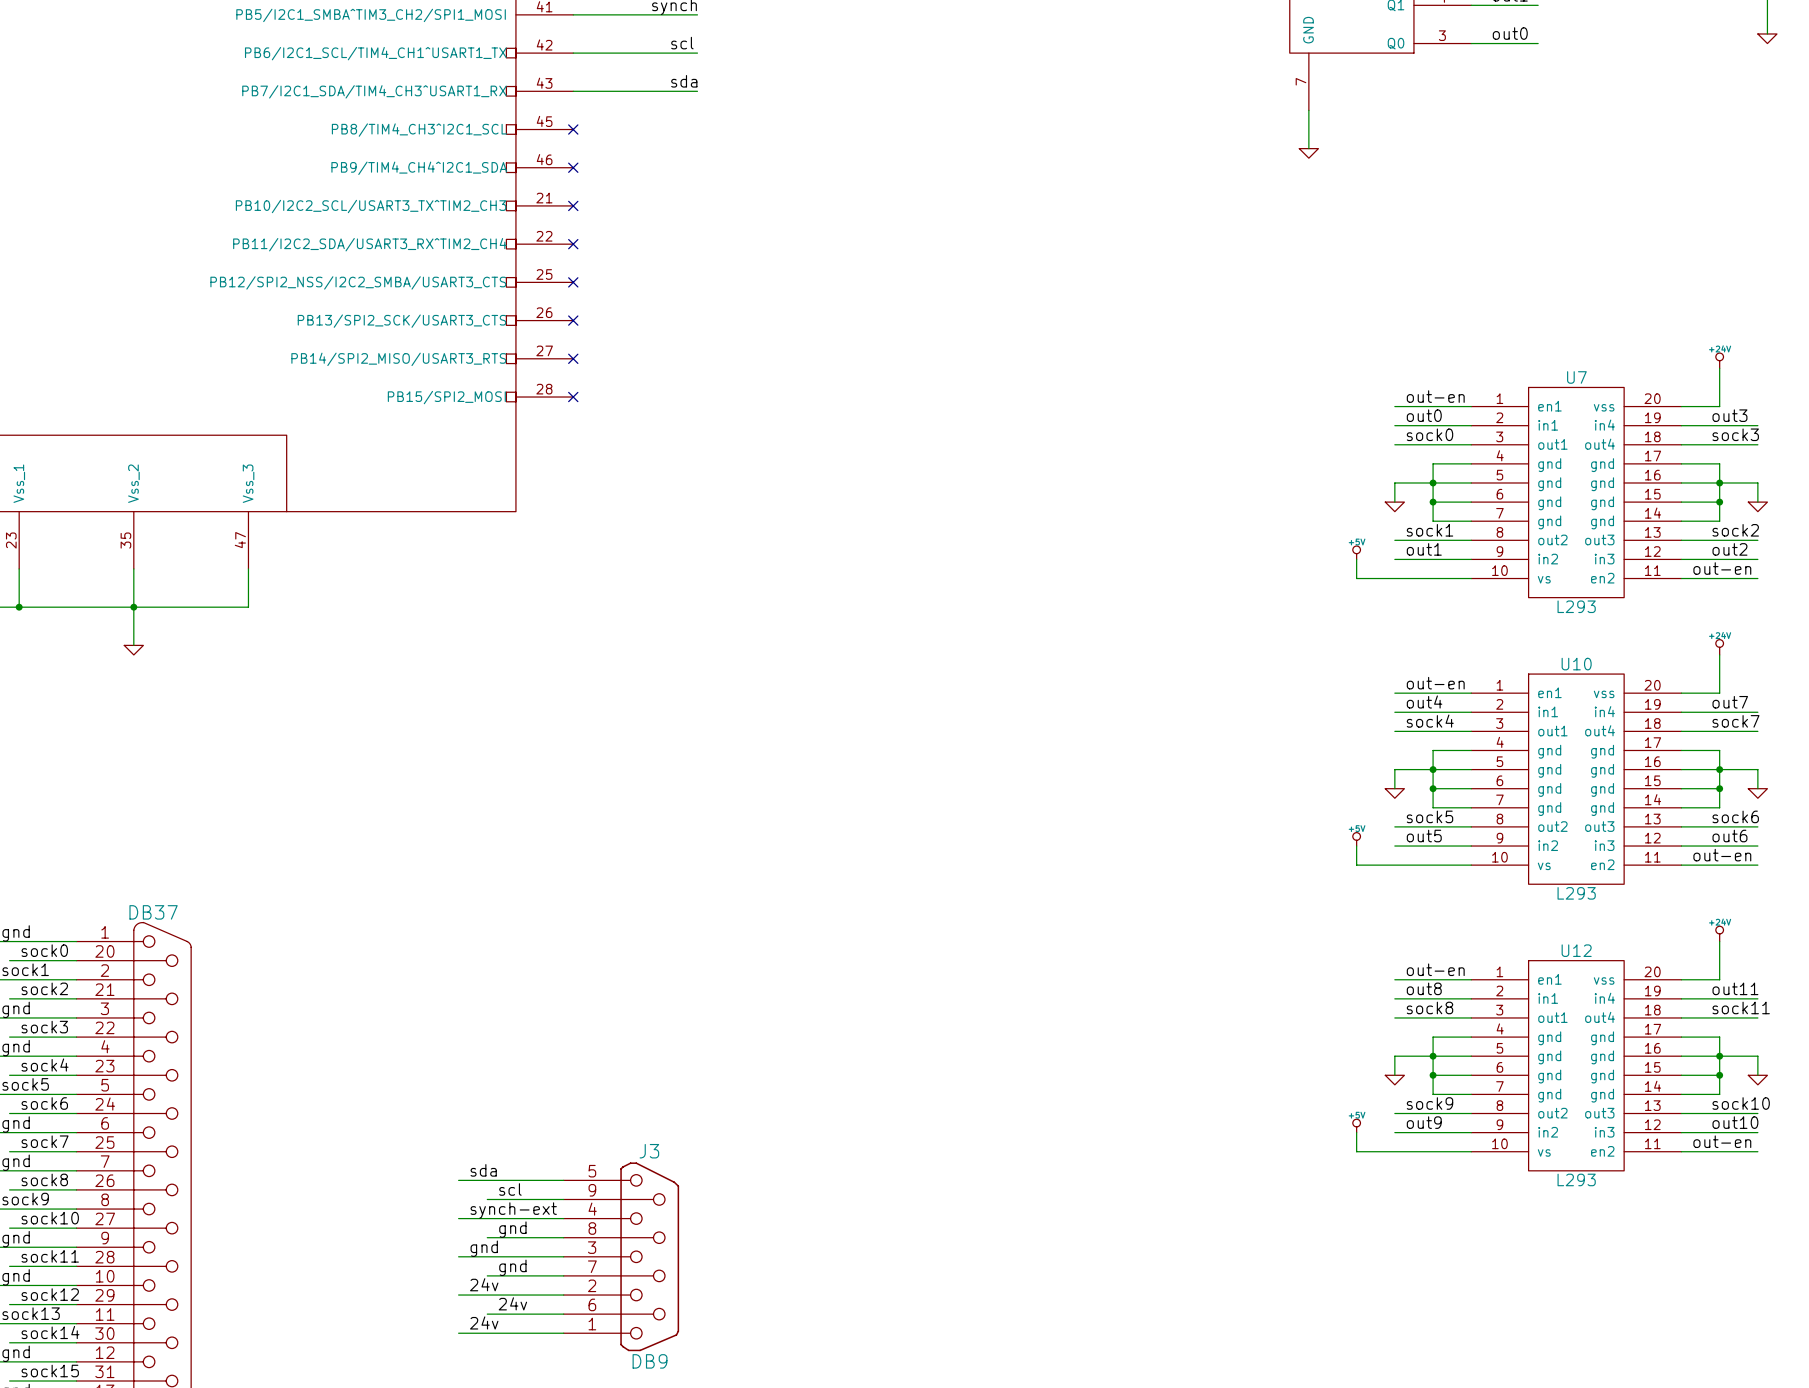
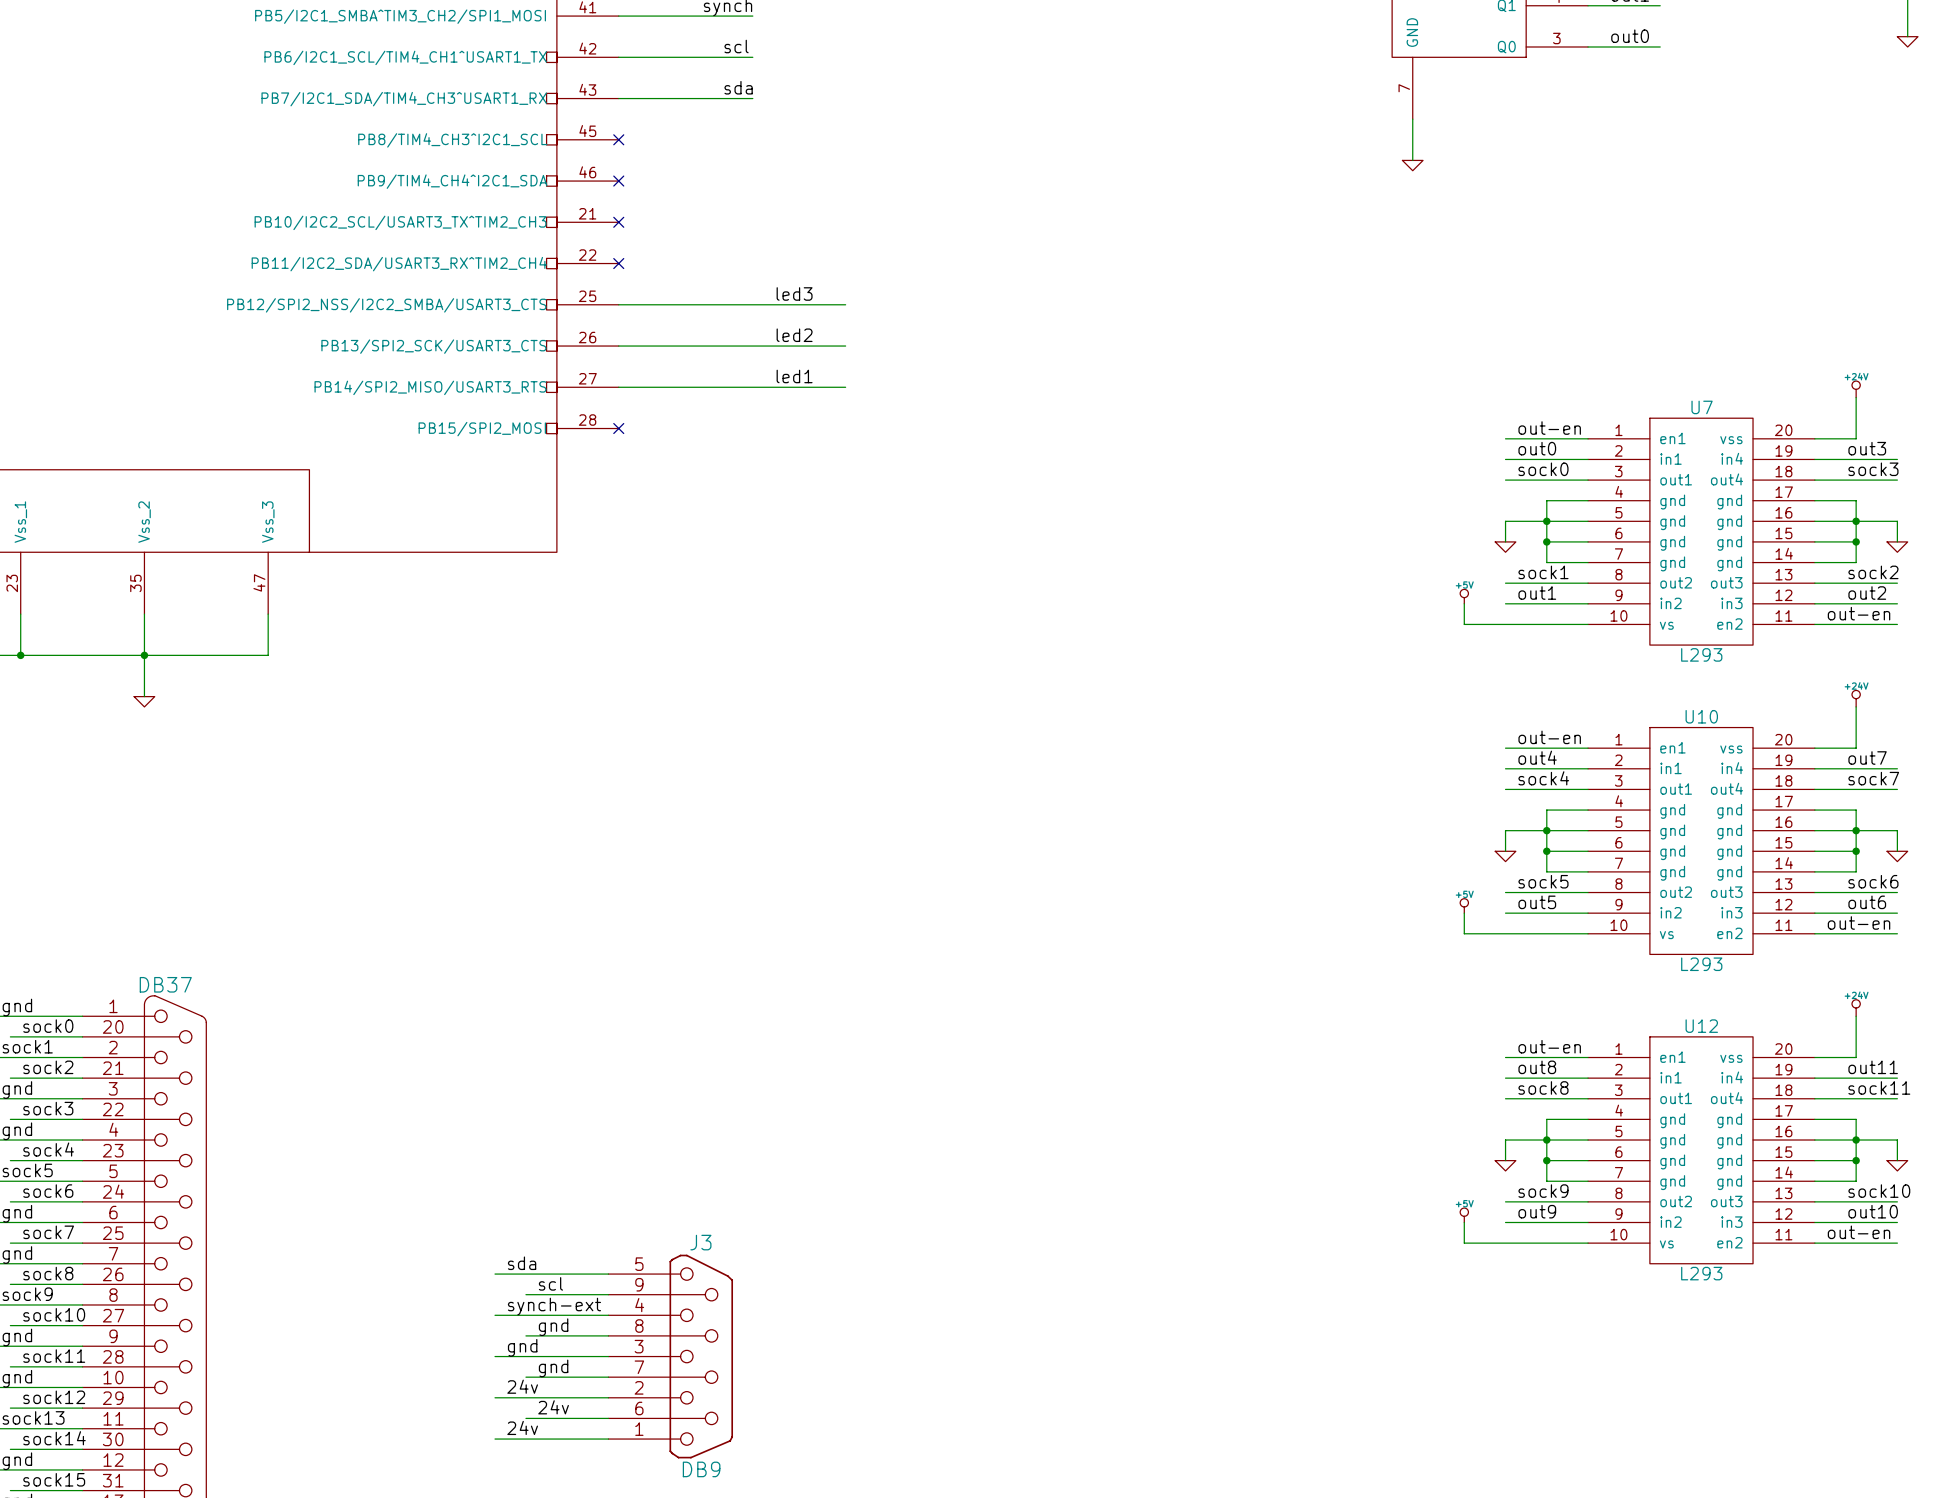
label: none -> led3 (794, 293)
wire: none -> (618, 304) (845, 304)
no-connect mark: (573, 282) -> none
label: none -> led2 (794, 335)
wire: none -> (618, 346) (845, 346)
no-connect mark: (573, 320) -> none
label: none -> led1 (794, 376)
wire: none -> (618, 387) (845, 387)
no-connect mark: (573, 358) -> none

